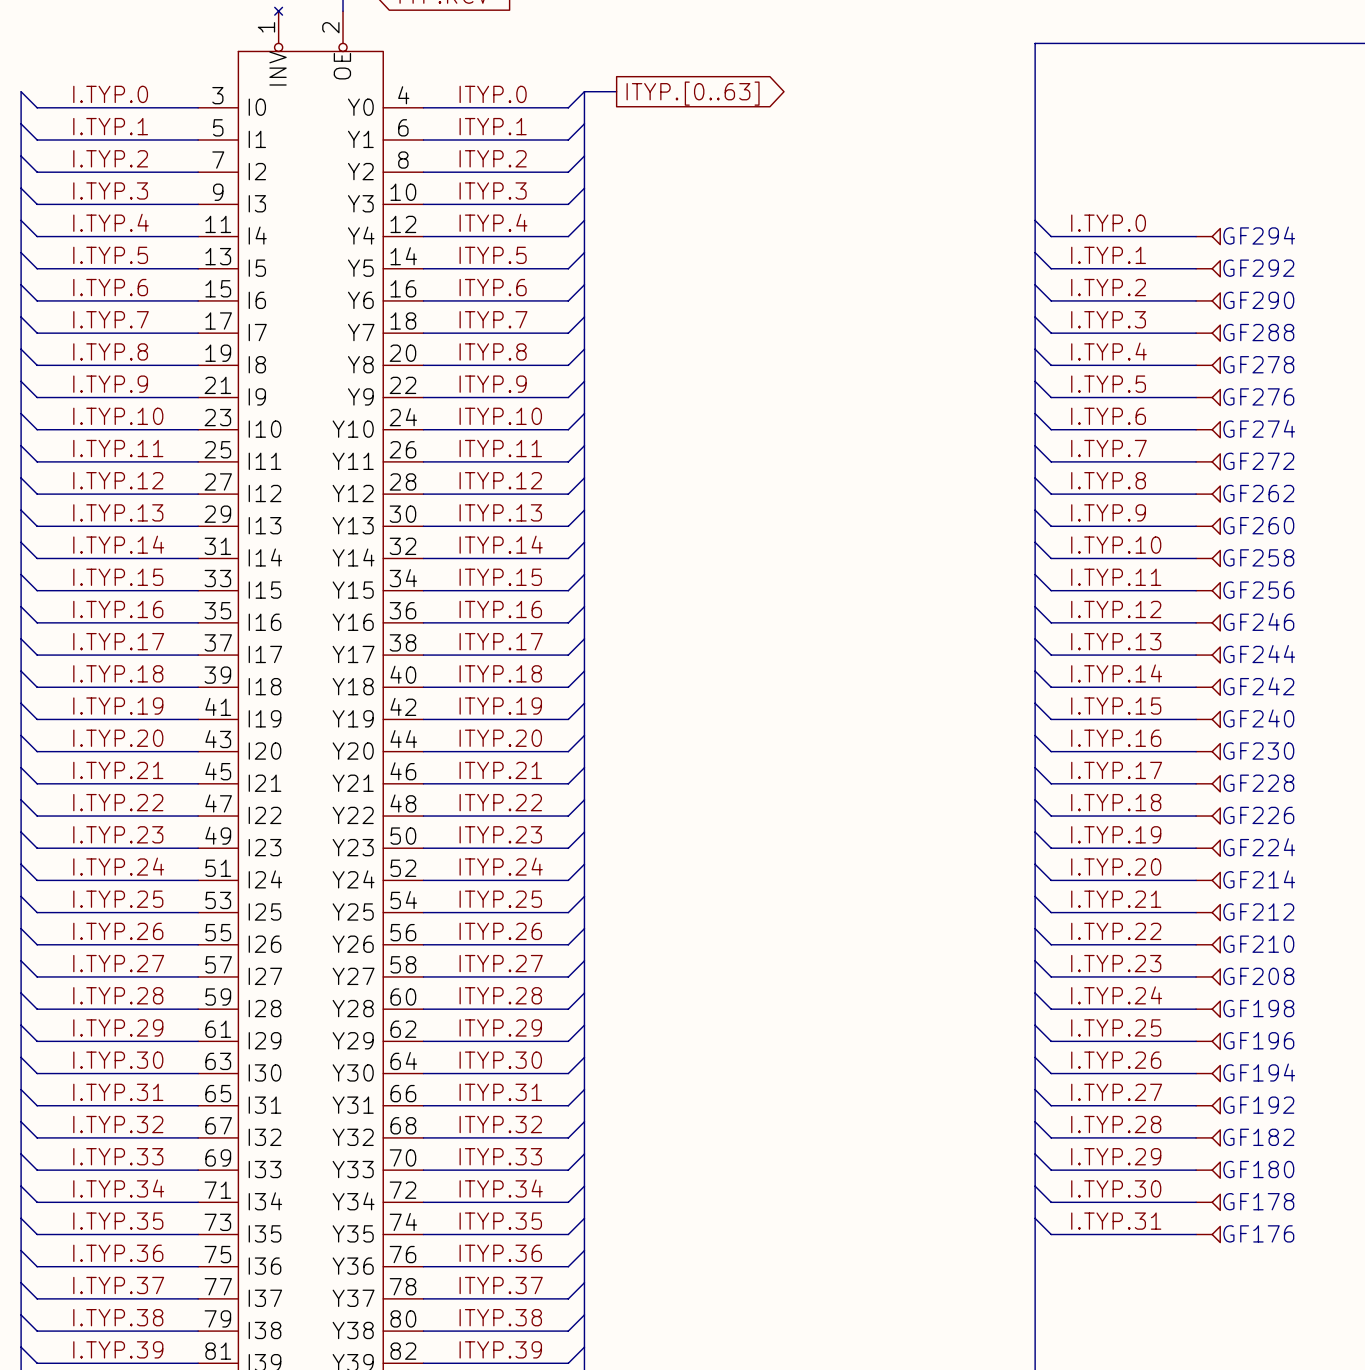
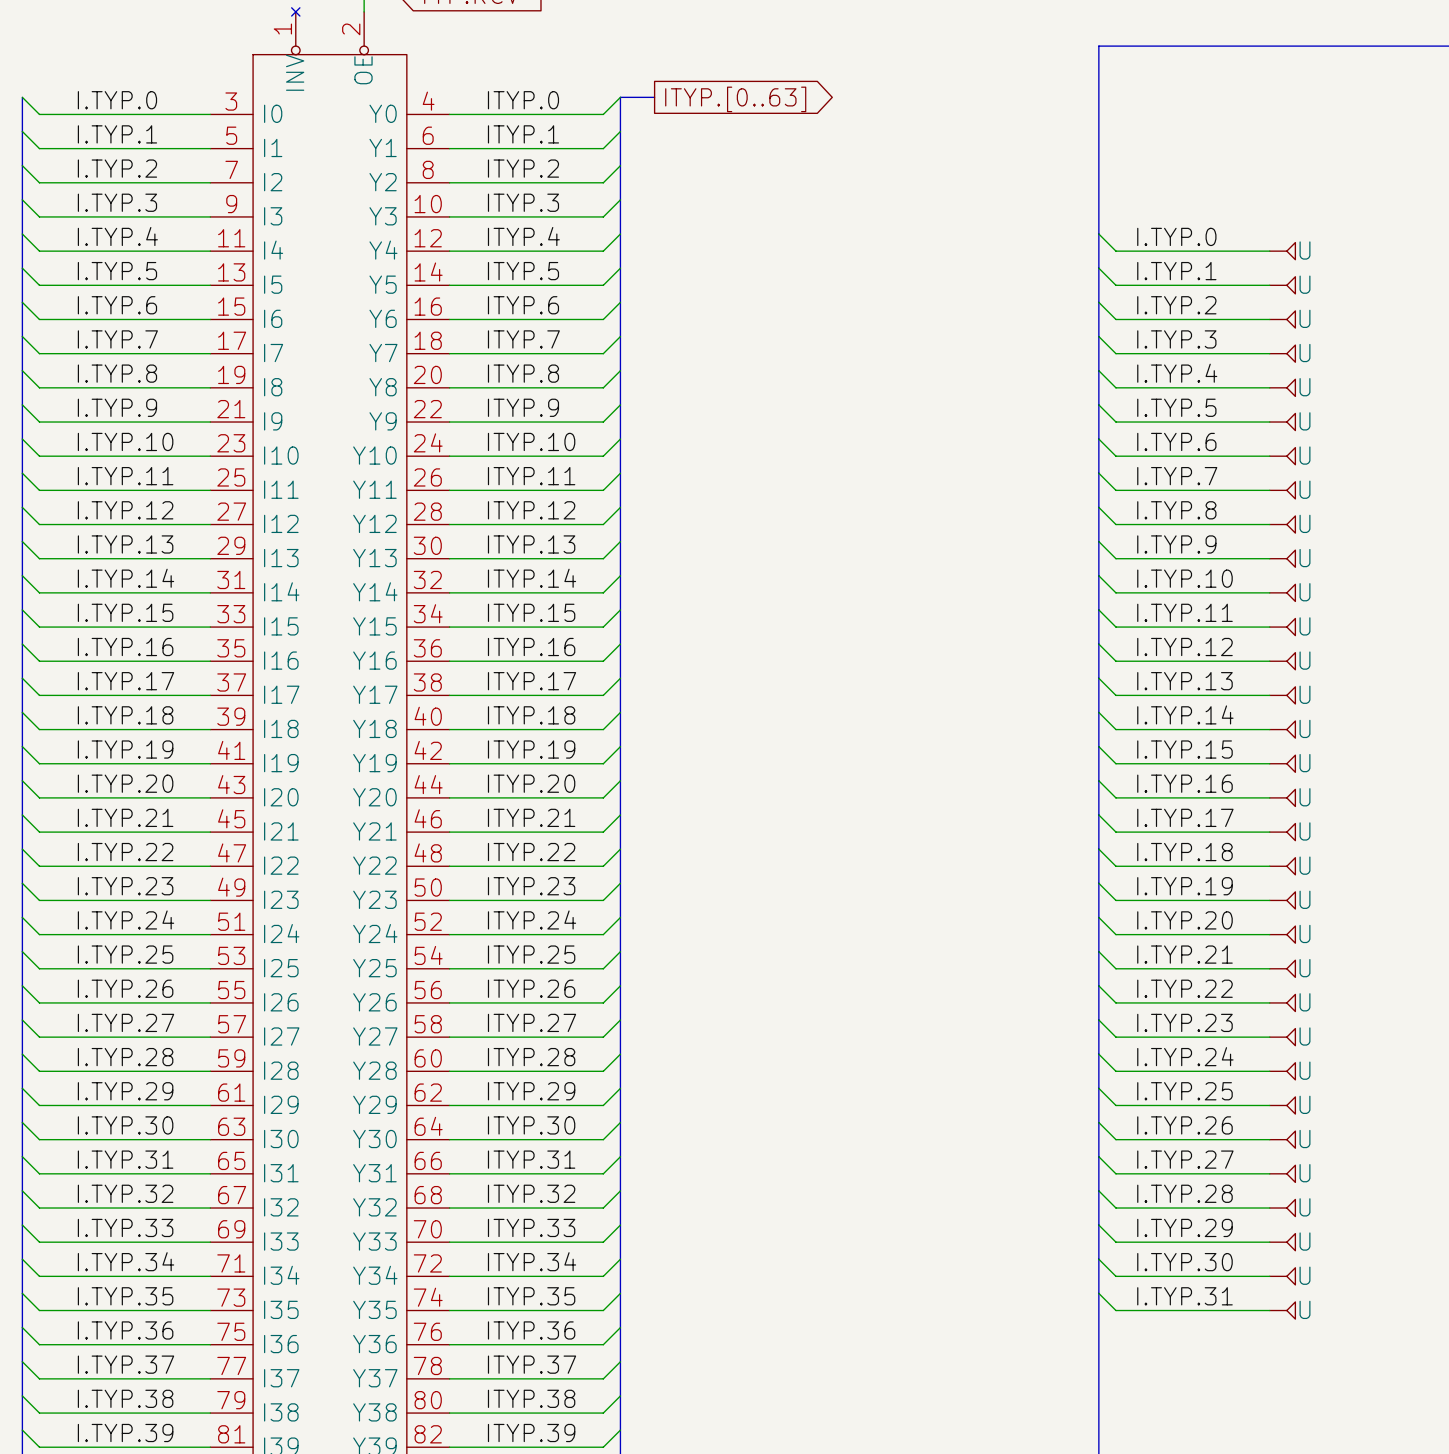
GF294 name: GF294 (1259, 235) -> U (1304, 250)
GF292 name: GF292 (1258, 268) -> U (1304, 284)
GF290 name: GF290 (1258, 300) -> U (1304, 318)
GF288 name: GF288 (1258, 332) -> U (1304, 353)
GF278 name: GF278 (1258, 364) -> U (1304, 387)
GF276 name: GF276 (1258, 396) -> U (1304, 421)
GF274 name: GF274 (1259, 428) -> U (1304, 455)
GF272 name: GF272 (1258, 461) -> U (1304, 489)
GF262 name: GF262 (1258, 493) -> U (1304, 523)
GF260 name: GF260 (1258, 525) -> U (1304, 558)
GF258 name: GF258 (1258, 557) -> U (1304, 592)
GF256 name: GF256 (1258, 590) -> U (1304, 626)
GF246 name: GF246 (1258, 621) -> U (1304, 660)
GF244 name: GF244 (1259, 654) -> U (1304, 694)
GF242 name: GF242 (1258, 686) -> U (1304, 728)
GF240 name: GF240 (1258, 718) -> U (1304, 763)
GF230 name: GF230 (1258, 751) -> U (1304, 797)
GF228 name: GF228 (1258, 783) -> U (1304, 831)
GF226 name: GF226 (1258, 815) -> U (1304, 865)
GF224 name: GF224 (1259, 847) -> U (1304, 899)
GF214 name: GF214 (1259, 879) -> U (1304, 933)
GF212 name: GF212 (1258, 911) -> U (1304, 968)
GF210 name: GF210 (1258, 944) -> U (1304, 1002)
GF208 name: GF208 (1258, 976) -> U (1304, 1036)
GF198 name: GF198 (1258, 1008) -> U (1304, 1070)
GF196 name: GF196 (1258, 1040) -> U (1304, 1104)
GF194 name: GF194 (1259, 1072) -> U (1304, 1139)
GF192 name: GF192 (1258, 1105) -> U (1304, 1173)
GF182 name: GF182 (1258, 1137) -> U (1304, 1207)
GF180 name: GF180 (1258, 1169) -> U (1304, 1241)
GF178 name: GF178 (1258, 1201) -> U (1304, 1275)
GF176 name: GF176 (1258, 1233) -> U (1304, 1309)

